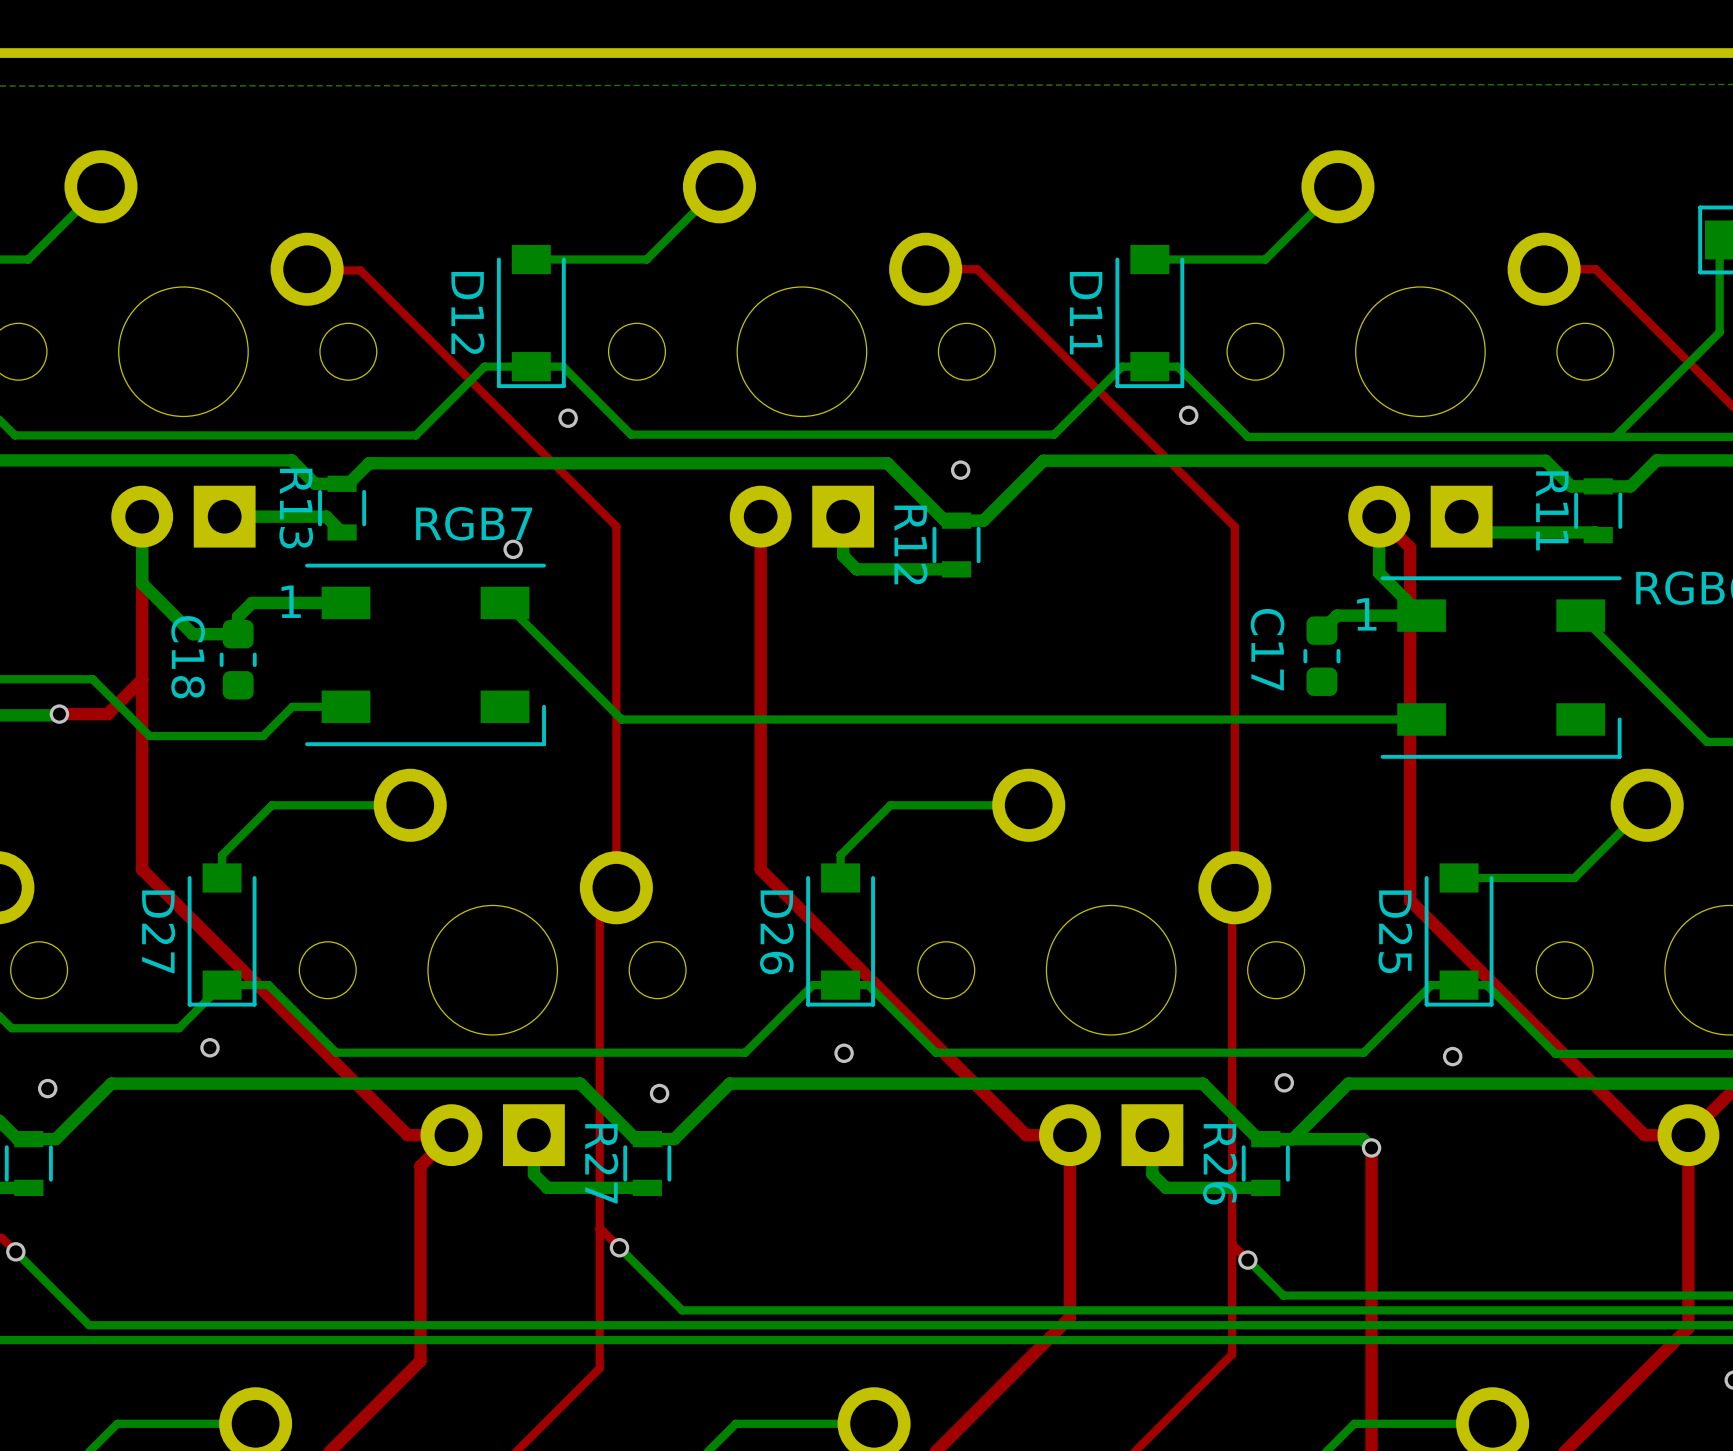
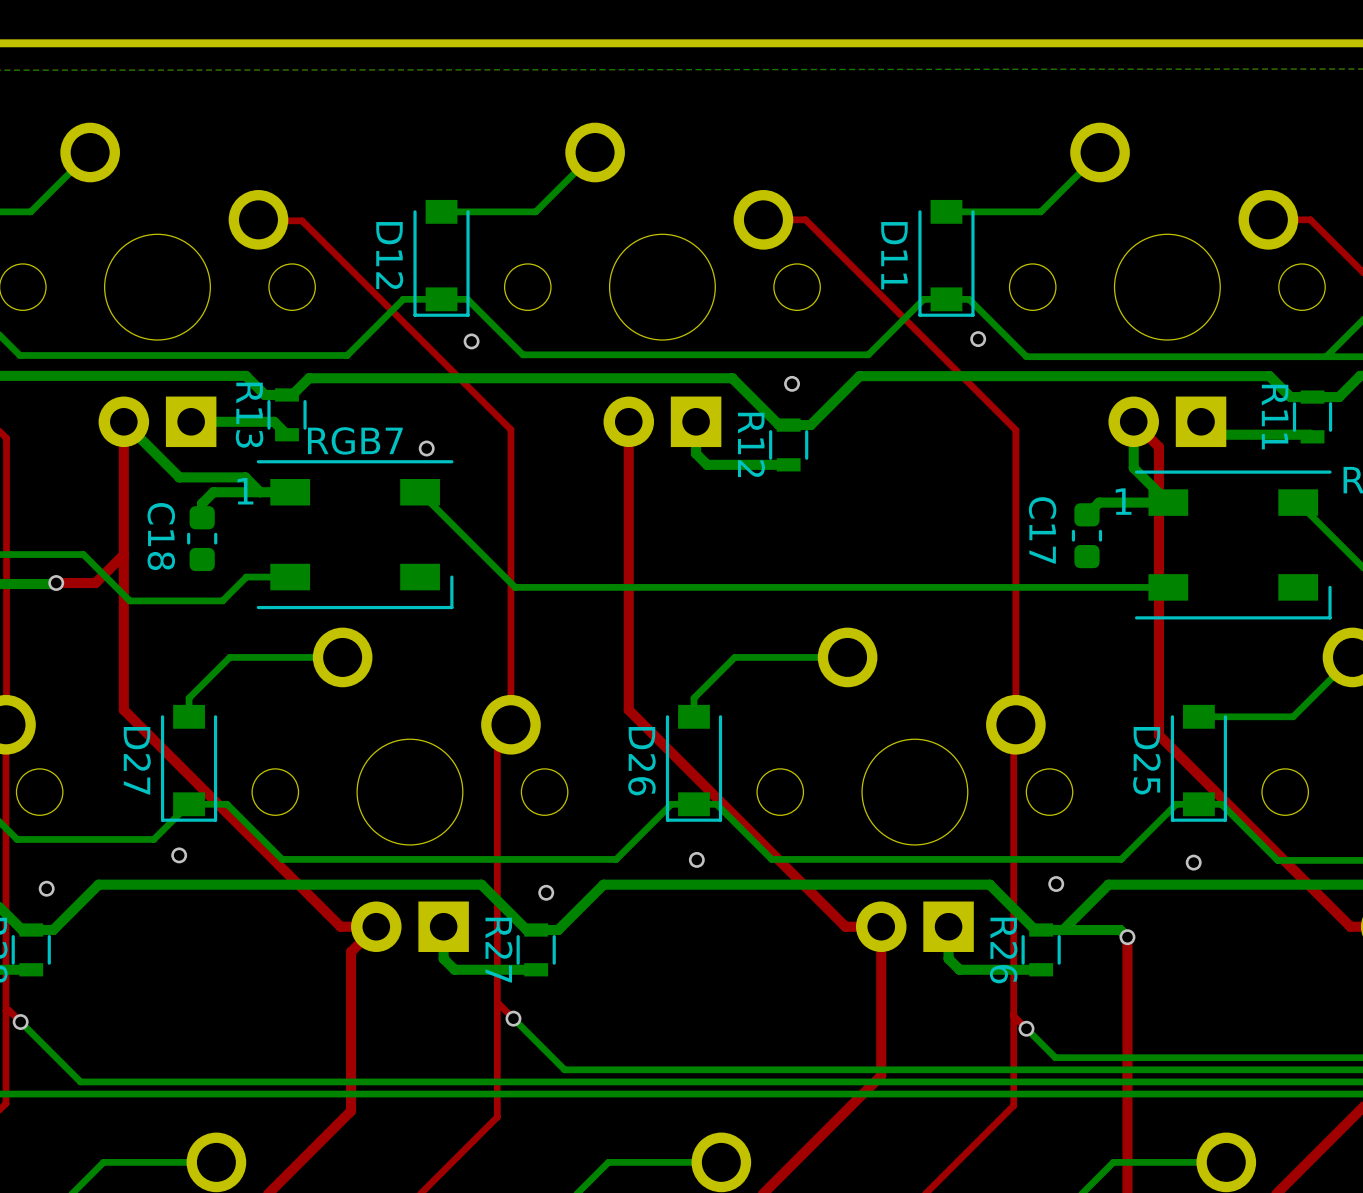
bottom track: (142, 516) (142, 583) (192, 634) (238, 634) -> (123, 421) (179, 477) (245, 477) (260, 492)
RGB7 name position: RGB7 (474, 523) -> RGB7 (355, 440)

